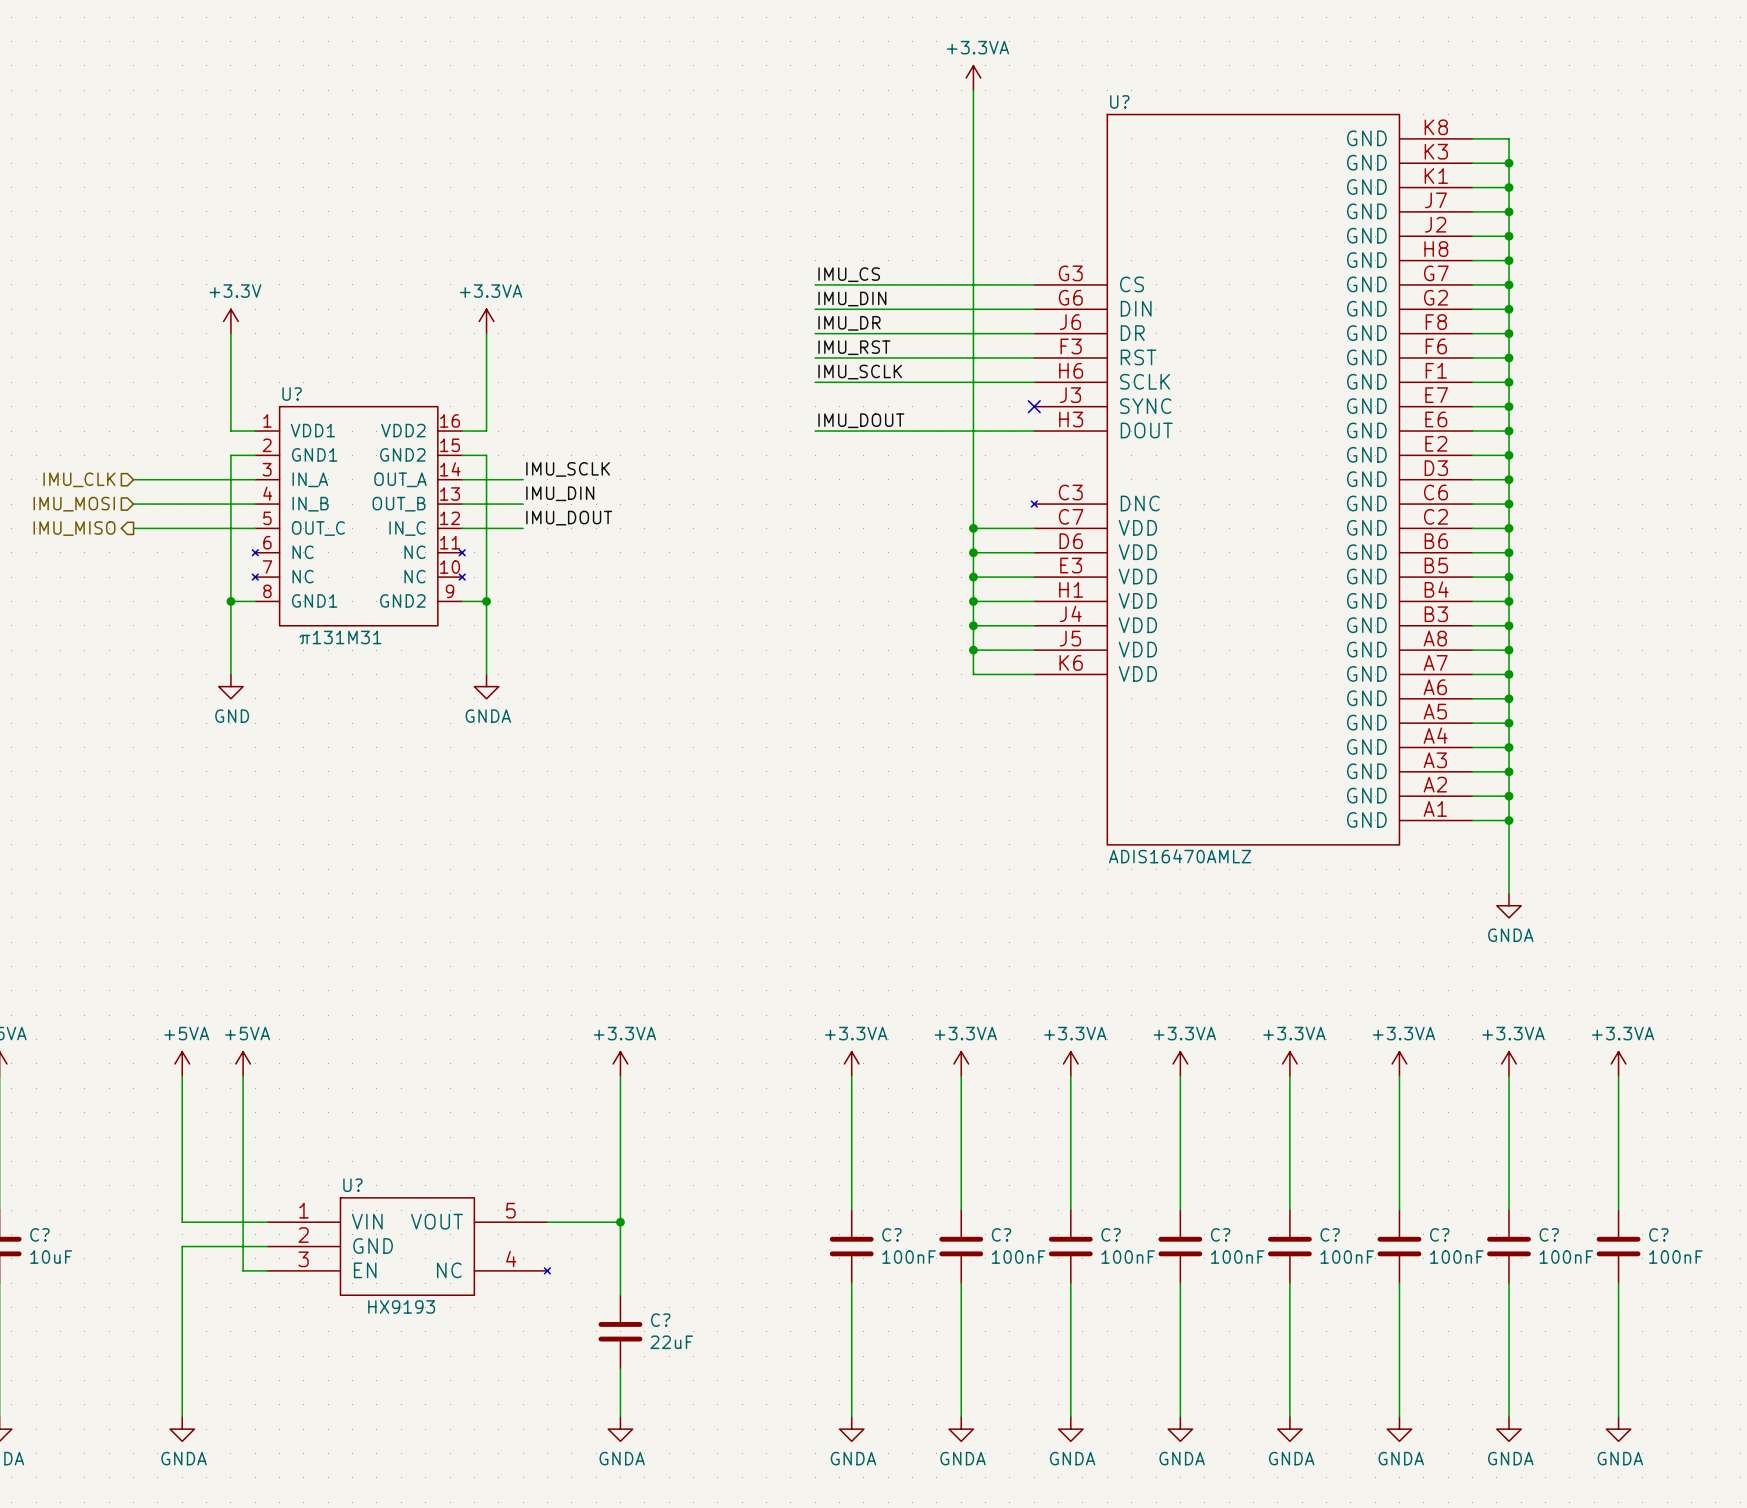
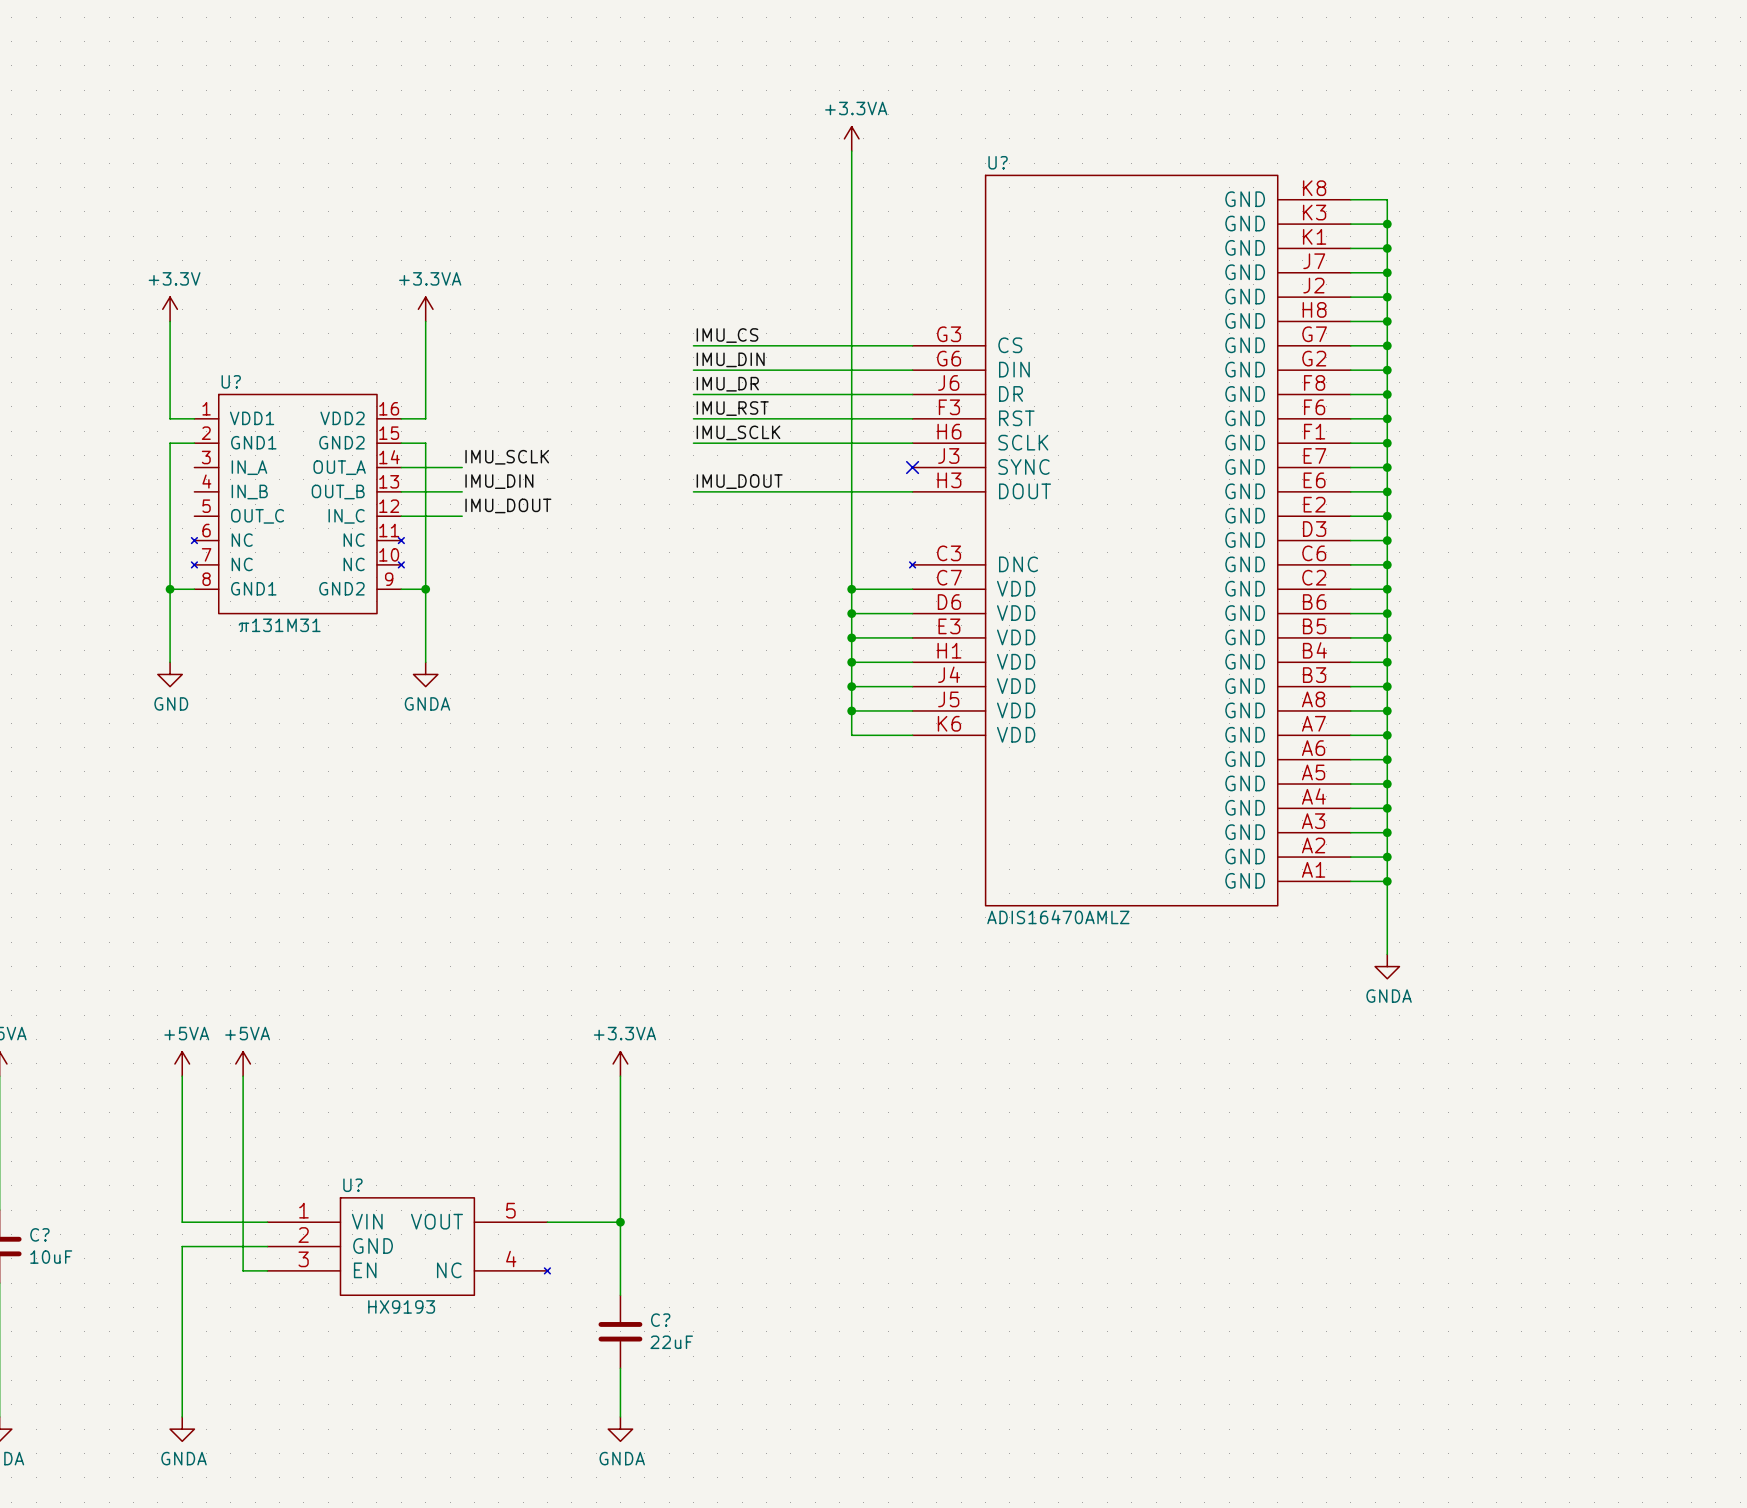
power symbol position: +3.3VA (973, 78) -> +3.3VA (851, 138)
wire: (973, 90) (973, 674) (1034, 674) -> (851, 151) (851, 735) (912, 735)
wire: (1472, 138) (1509, 138) (1509, 893) -> (1350, 199) (1387, 199) (1387, 954)
wire: (1472, 163) (1509, 163) -> (1350, 224) (1387, 224)
junction: (1509, 163) -> none
wire: (1472, 187) (1509, 187) -> (1350, 248) (1387, 248)
junction: (1509, 187) -> none
wire: (1472, 211) (1509, 211) -> (1350, 272) (1387, 272)
junction: (1509, 211) -> none
junction: none -> (1387, 224)
wire: (1472, 236) (1509, 236) -> (1350, 297) (1387, 297)
junction: (1509, 236) -> none
junction: none -> (1387, 248)
wire: (1472, 260) (1509, 260) -> (1350, 321) (1387, 321)
junction: (1509, 260) -> none
junction: none -> (1387, 272)
label position: IMU_CS (849, 274) -> IMU_CS (727, 335)
wire: (815, 284) (1034, 284) -> (693, 345) (912, 345)
wire: (1472, 284) (1509, 284) -> (1350, 345) (1387, 345)
junction: (1509, 284) -> none
junction: none -> (1387, 297)
label: IMU_DIN (852, 299) -> none
wire: (815, 309) (1034, 309) -> (693, 370) (912, 370)
wire: (1472, 309) (1509, 309) -> (1350, 370) (1387, 370)
junction: (1509, 309) -> none
power symbol position: +3.3V (230, 321) -> +3.3V (170, 309)
power symbol position: +3.3VA (486, 321) -> +3.3VA (425, 309)
junction: none -> (1387, 321)
label position: IMU_DR (849, 323) -> IMU_DR (727, 384)
wire: (230, 333) (230, 431) (255, 431) -> (170, 321) (170, 418) (194, 418)
wire: (486, 333) (486, 431) (462, 431) -> (425, 321) (425, 418) (401, 418)
wire: (815, 333) (1034, 333) -> (693, 394) (912, 394)
wire: (1472, 333) (1509, 333) -> (1350, 394) (1387, 394)
junction: (1509, 333) -> none
junction: none -> (1387, 345)
label position: IMU_RST (854, 347) -> IMU_RST (732, 408)
wire: (815, 357) (1034, 357) -> (693, 418) (912, 418)
wire: (1472, 357) (1509, 357) -> (1350, 418) (1387, 418)
junction: (1509, 357) -> none
label: none -> IMU_DIN (730, 359)
junction: none -> (1387, 370)
label: IMU_SCLK (860, 372) -> none
wire: (815, 382) (1034, 382) -> (693, 443) (912, 443)
wire: (1472, 382) (1509, 382) -> (1350, 443) (1387, 443)
junction: (1509, 382) -> none
junction: none -> (1387, 394)
no-connect mark: (1034, 406) -> none
wire: (1472, 406) (1509, 406) -> (1350, 467) (1387, 467)
junction: (1509, 406) -> none
junction: none -> (1387, 418)
label: IMU_DOUT (861, 420) -> none
wire: (815, 431) (1034, 431) -> (693, 491) (912, 491)
wire: (1472, 431) (1509, 431) -> (1350, 491) (1387, 491)
junction: (1509, 431) -> none
label: none -> IMU_SCLK (738, 432)
junction: none -> (1387, 443)
wire: (255, 455) (230, 455) (230, 674) -> (194, 443) (170, 443) (170, 662)
wire: (462, 455) (486, 455) (486, 674) -> (401, 443) (425, 443) (425, 662)
wire: (1472, 455) (1509, 455) -> (1350, 516) (1387, 516)
junction: (1509, 455) -> none
no-connect mark: none -> (912, 467)
junction: none -> (1387, 467)
label position: IMU_SCLK (568, 469) -> IMU_SCLK (507, 457)
hierarchical label: IMU_CLK (79, 479) -> none
wire: (133, 479) (255, 479) -> none
wire: (462, 479) (523, 479) -> (401, 467) (462, 467)
U? position: (1251, 479) -> (1130, 540)
wire: (1472, 479) (1509, 479) -> (1350, 540) (1387, 540)
junction: (1509, 479) -> none
label: none -> IMU_DOUT (739, 481)
junction: none -> (1387, 491)
label position: IMU_DIN (560, 493) -> IMU_DIN (499, 481)
hierarchical label: IMU_MOSI (74, 504) -> none
wire: (133, 504) (255, 504) -> none
wire: (462, 504) (523, 504) -> (401, 491) (462, 491)
wire: (1472, 504) (1509, 504) -> (1350, 564) (1387, 564)
junction: (1509, 504) -> none
U? position: (358, 516) -> (297, 504)
junction: none -> (1387, 516)
label position: IMU_DOUT (569, 518) -> IMU_DOUT (508, 505)
hierarchical label: IMU_MISO (74, 528) -> none
wire: (133, 528) (255, 528) -> none
wire: (462, 528) (523, 528) -> (401, 516) (462, 516)
wire: (973, 528) (1034, 528) -> (851, 589) (912, 589)
junction: (973, 528) -> none
wire: (1472, 528) (1509, 528) -> (1350, 589) (1387, 589)
junction: (1509, 528) -> none
junction: none -> (1387, 540)
wire: (973, 552) (1034, 552) -> (851, 613) (912, 613)
junction: (973, 552) -> none
wire: (1472, 552) (1509, 552) -> (1350, 613) (1387, 613)
junction: (1509, 552) -> none
junction: none -> (1387, 564)
wire: (973, 577) (1034, 577) -> (851, 637) (912, 637)
junction: (973, 577) -> none
wire: (1472, 577) (1509, 577) -> (1350, 637) (1387, 637)
junction: (1509, 577) -> none
junction: none -> (170, 589)
junction: none -> (425, 589)
junction: none -> (851, 589)
junction: none -> (1387, 589)
wire: (230, 601) (255, 601) -> (170, 589) (194, 589)
junction: (230, 601) -> none
wire: (462, 601) (486, 601) -> (401, 589) (425, 589)
junction: (486, 601) -> none
wire: (973, 601) (1034, 601) -> (851, 662) (912, 662)
junction: (973, 601) -> none
wire: (1472, 601) (1509, 601) -> (1350, 662) (1387, 662)
junction: (1509, 601) -> none
junction: none -> (851, 613)
junction: none -> (1387, 613)
wire: (973, 625) (1034, 625) -> (851, 686) (912, 686)
junction: (973, 625) -> none
wire: (1472, 625) (1509, 625) -> (1350, 686) (1387, 686)
junction: (1509, 625) -> none
junction: none -> (851, 637)
junction: none -> (1387, 637)
wire: (973, 650) (1034, 650) -> (851, 710) (912, 710)
junction: (973, 650) -> none
wire: (1472, 650) (1509, 650) -> (1350, 710) (1387, 710)
junction: (1509, 650) -> none
junction: none -> (851, 662)
junction: none -> (1387, 662)
wire: (1472, 674) (1509, 674) -> (1350, 735) (1387, 735)
junction: (1509, 674) -> none
power symbol position: GND (230, 686) -> GND (170, 674)
power symbol position: GNDA (486, 686) -> GNDA (425, 674)
junction: none -> (851, 686)
junction: none -> (1387, 686)
wire: (1472, 698) (1509, 698) -> (1350, 759) (1387, 759)
junction: (1509, 698) -> none
junction: none -> (851, 710)
junction: none -> (1387, 710)
wire: (1472, 723) (1509, 723) -> (1350, 784) (1387, 784)
junction: (1509, 723) -> none
junction: none -> (1387, 735)
wire: (1472, 747) (1509, 747) -> (1350, 808) (1387, 808)
junction: (1509, 747) -> none
junction: none -> (1387, 759)
wire: (1472, 771) (1509, 771) -> (1350, 832) (1387, 832)
junction: (1509, 771) -> none
junction: none -> (1387, 784)
wire: (1472, 796) (1509, 796) -> (1350, 857) (1387, 857)
junction: (1509, 796) -> none
junction: none -> (1387, 808)
wire: (1472, 820) (1509, 820) -> (1350, 881) (1387, 881)
junction: (1509, 820) -> none
junction: none -> (1387, 832)
junction: none -> (1387, 857)
junction: none -> (1387, 881)
power symbol position: GNDA (1509, 905) -> GNDA (1387, 966)
power symbol: +3.3VA (851, 1063) -> none
power symbol: +3.3VA (961, 1063) -> none
power symbol: +3.3VA (1070, 1063) -> none
power symbol: +3.3VA (1180, 1063) -> none
power symbol: +3.3VA (1289, 1063) -> none
power symbol: +3.3VA (1399, 1063) -> none
power symbol: +3.3VA (1509, 1063) -> none
power symbol: +3.3VA (1618, 1063) -> none
wire: (851, 1076) (851, 1210) -> none
wire: (961, 1076) (961, 1210) -> none
wire: (1070, 1076) (1070, 1210) -> none
wire: (1180, 1076) (1180, 1210) -> none
wire: (1289, 1076) (1289, 1210) -> none
wire: (1399, 1076) (1399, 1210) -> none
wire: (1509, 1076) (1509, 1210) -> none
wire: (1618, 1076) (1618, 1210) -> none
C?: 100nF (851, 1246) -> none
C?: 100nF (961, 1246) -> none
C?: 100nF (1070, 1246) -> none
C?: 100nF (1180, 1246) -> none
C?: 100nF (1289, 1246) -> none
C?: 100nF (1399, 1246) -> none
C?: 100nF (1509, 1246) -> none
C?: 100nF (1618, 1246) -> none
wire: (851, 1283) (851, 1416) -> none
wire: (961, 1283) (961, 1416) -> none
wire: (1070, 1283) (1070, 1416) -> none
wire: (1180, 1283) (1180, 1416) -> none
wire: (1289, 1283) (1289, 1416) -> none
wire: (1399, 1283) (1399, 1416) -> none
wire: (1509, 1283) (1509, 1416) -> none
wire: (1618, 1283) (1618, 1416) -> none
power symbol: GNDA (851, 1429) -> none
power symbol: GNDA (961, 1429) -> none
power symbol: GNDA (1070, 1429) -> none
power symbol: GNDA (1180, 1429) -> none
power symbol: GNDA (1289, 1429) -> none
power symbol: GNDA (1399, 1429) -> none
power symbol: GNDA (1509, 1429) -> none
power symbol: GNDA (1618, 1429) -> none

